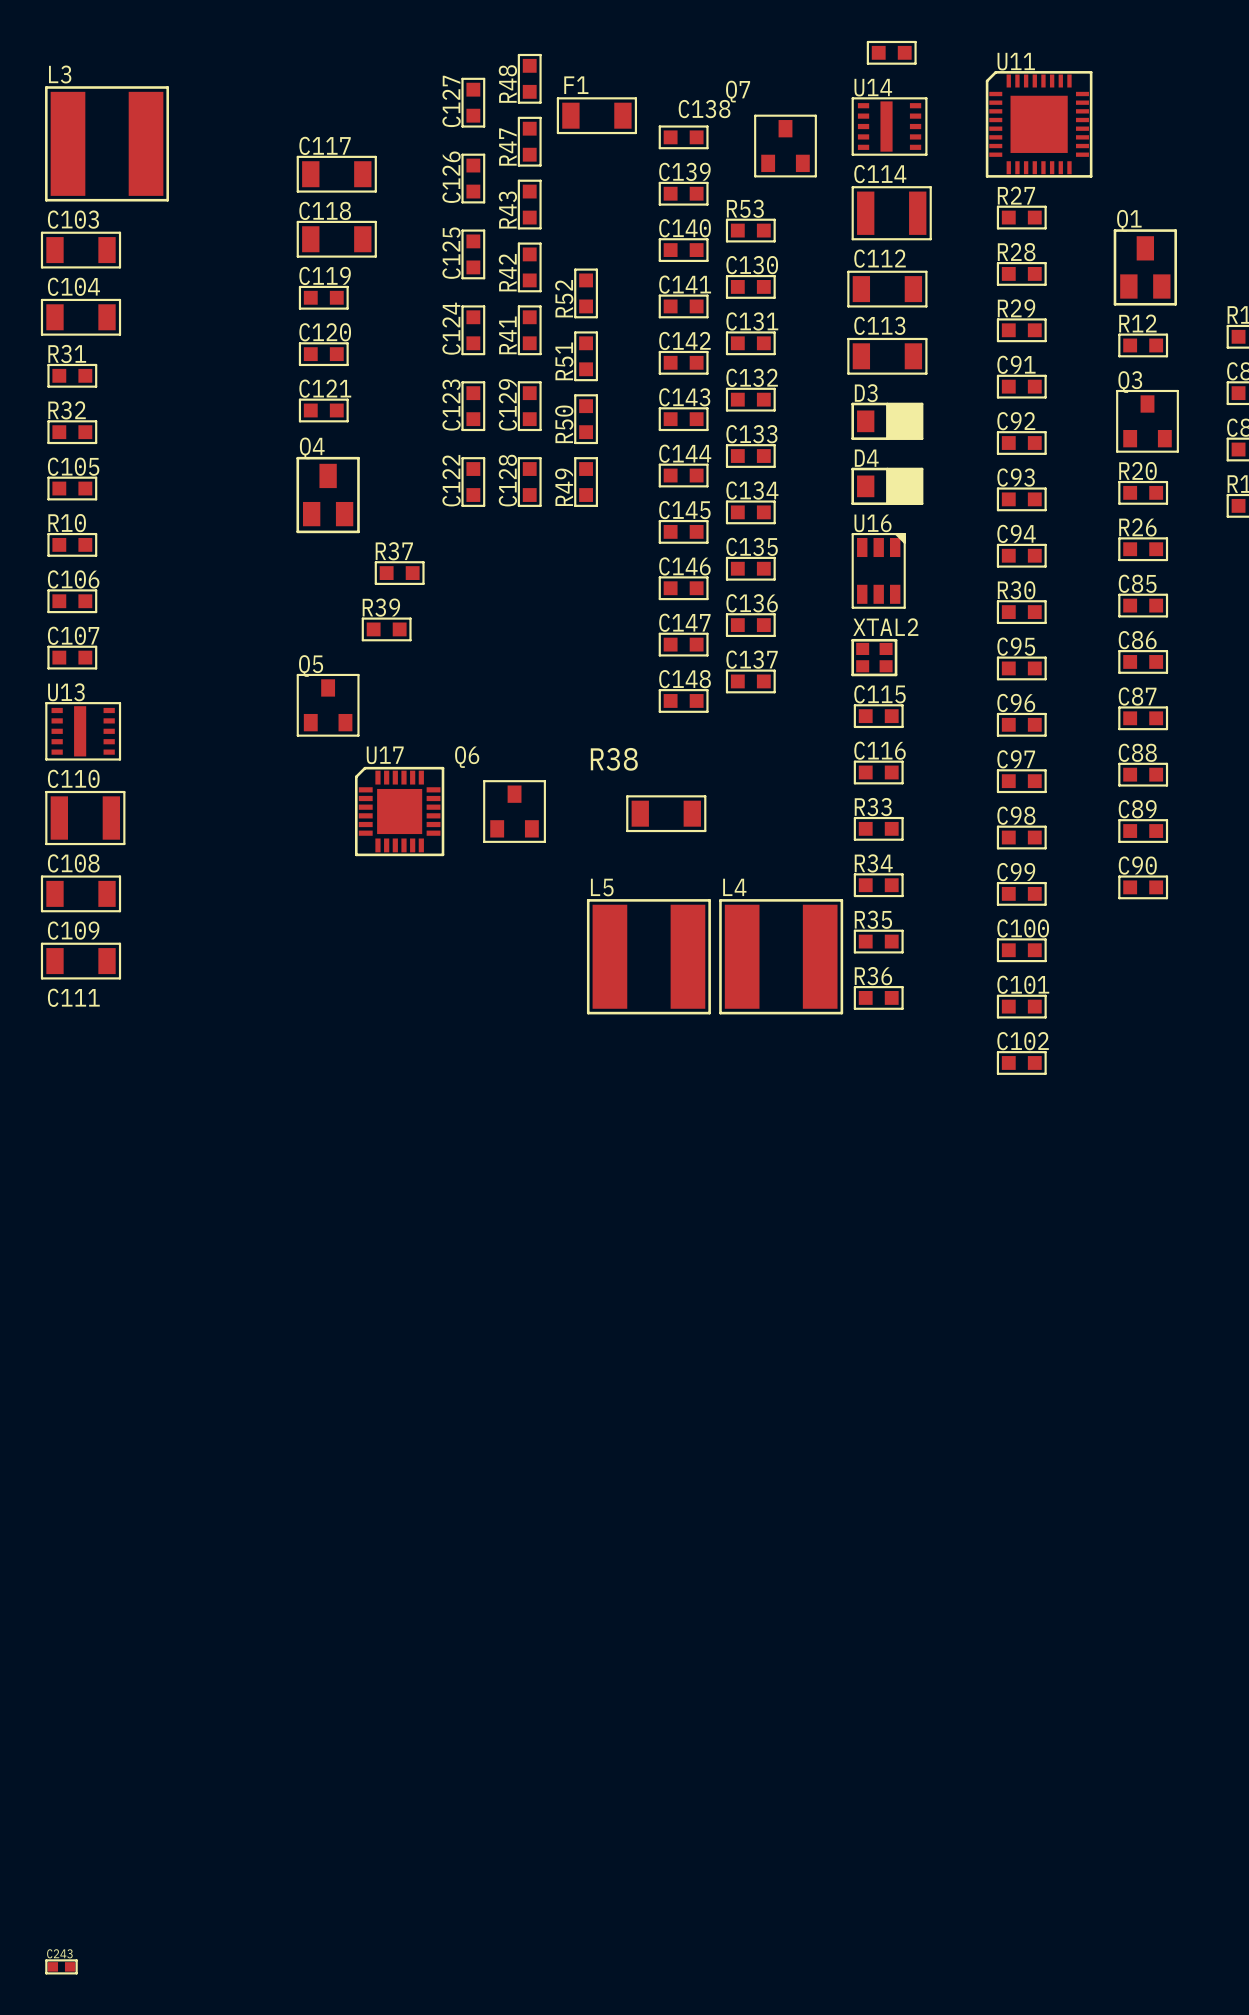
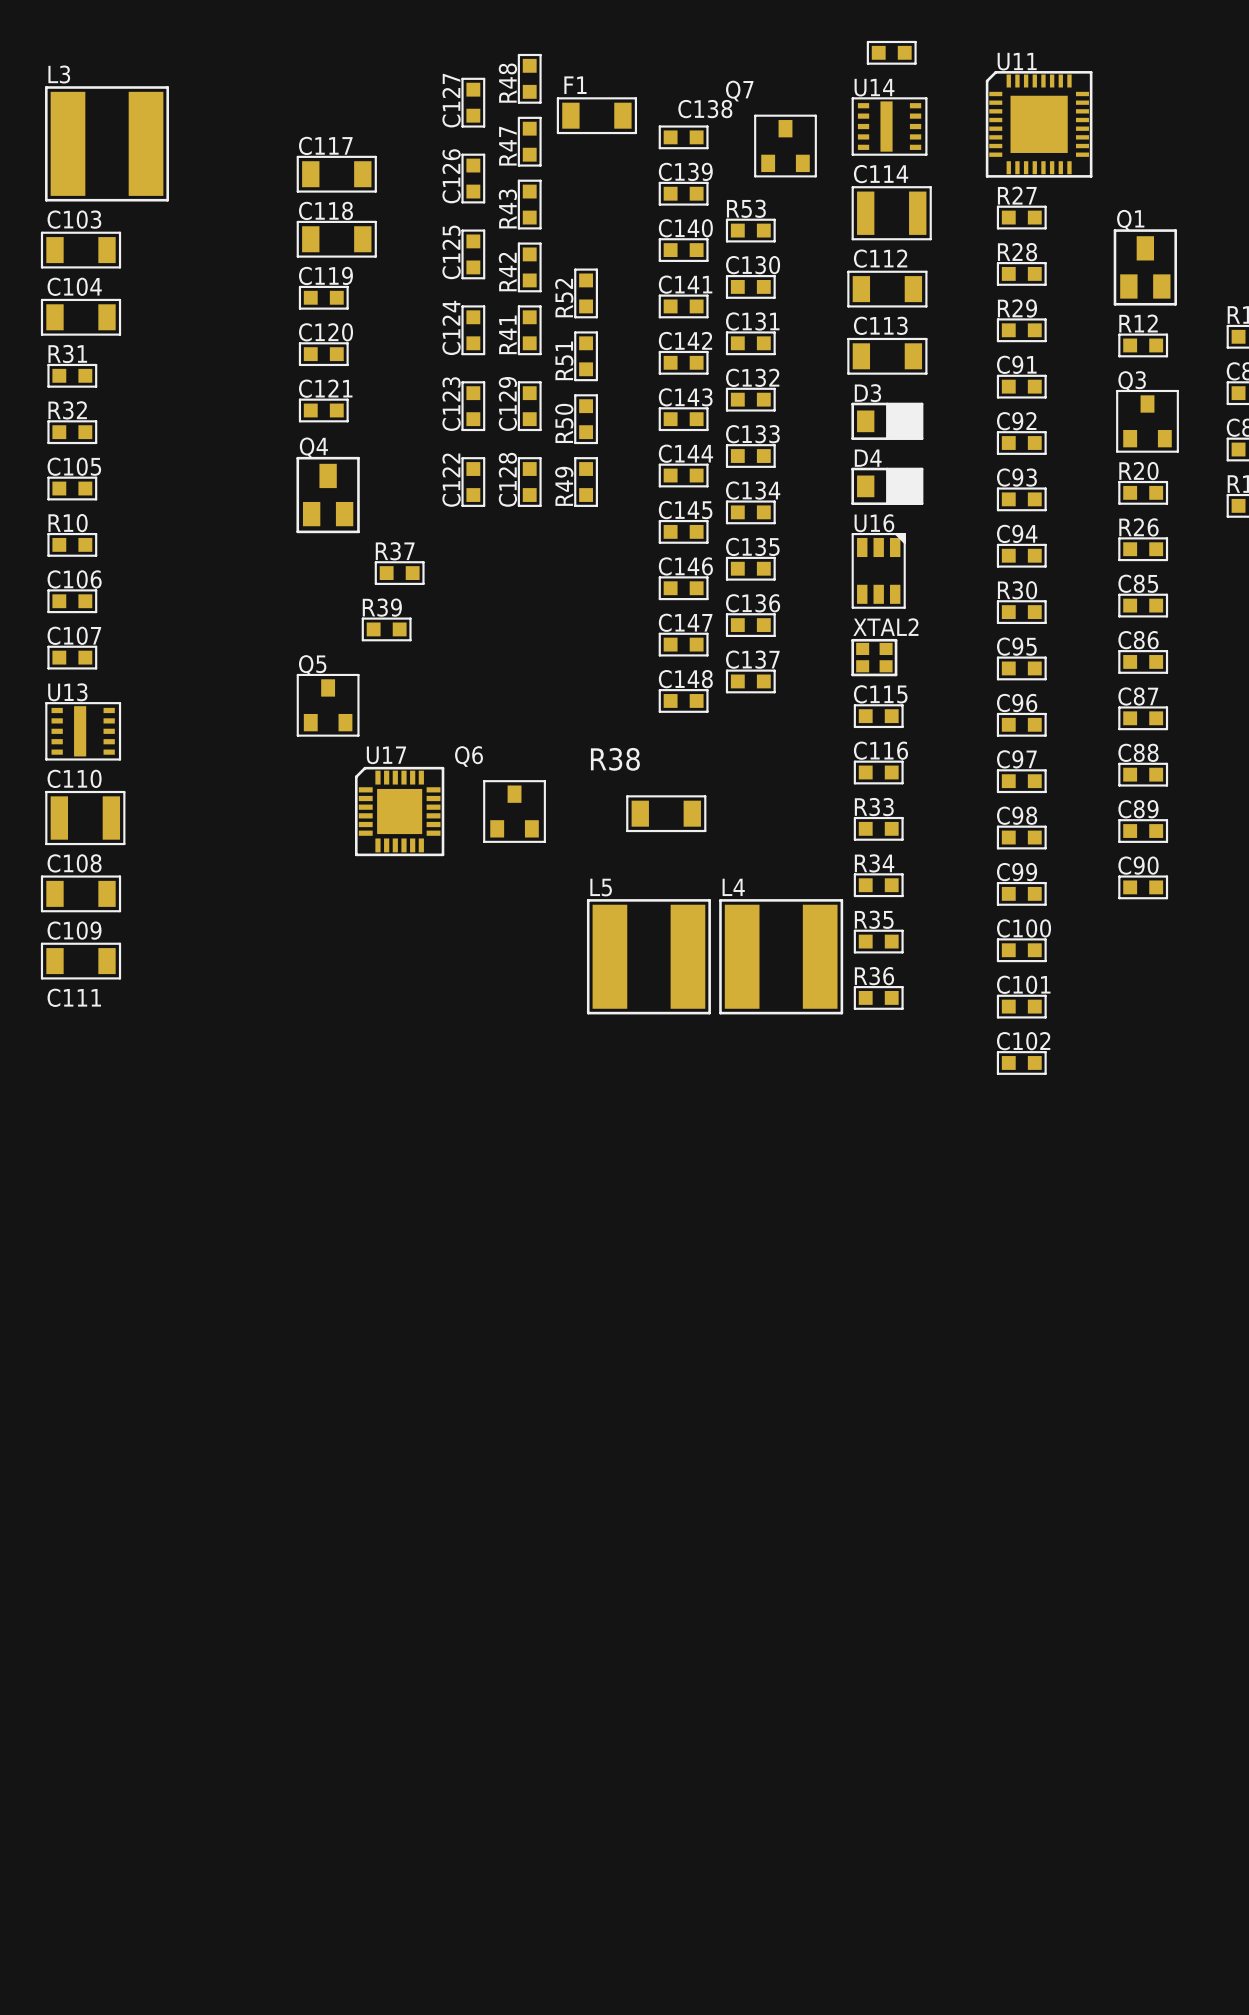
C243: (61, 1966) -> none

